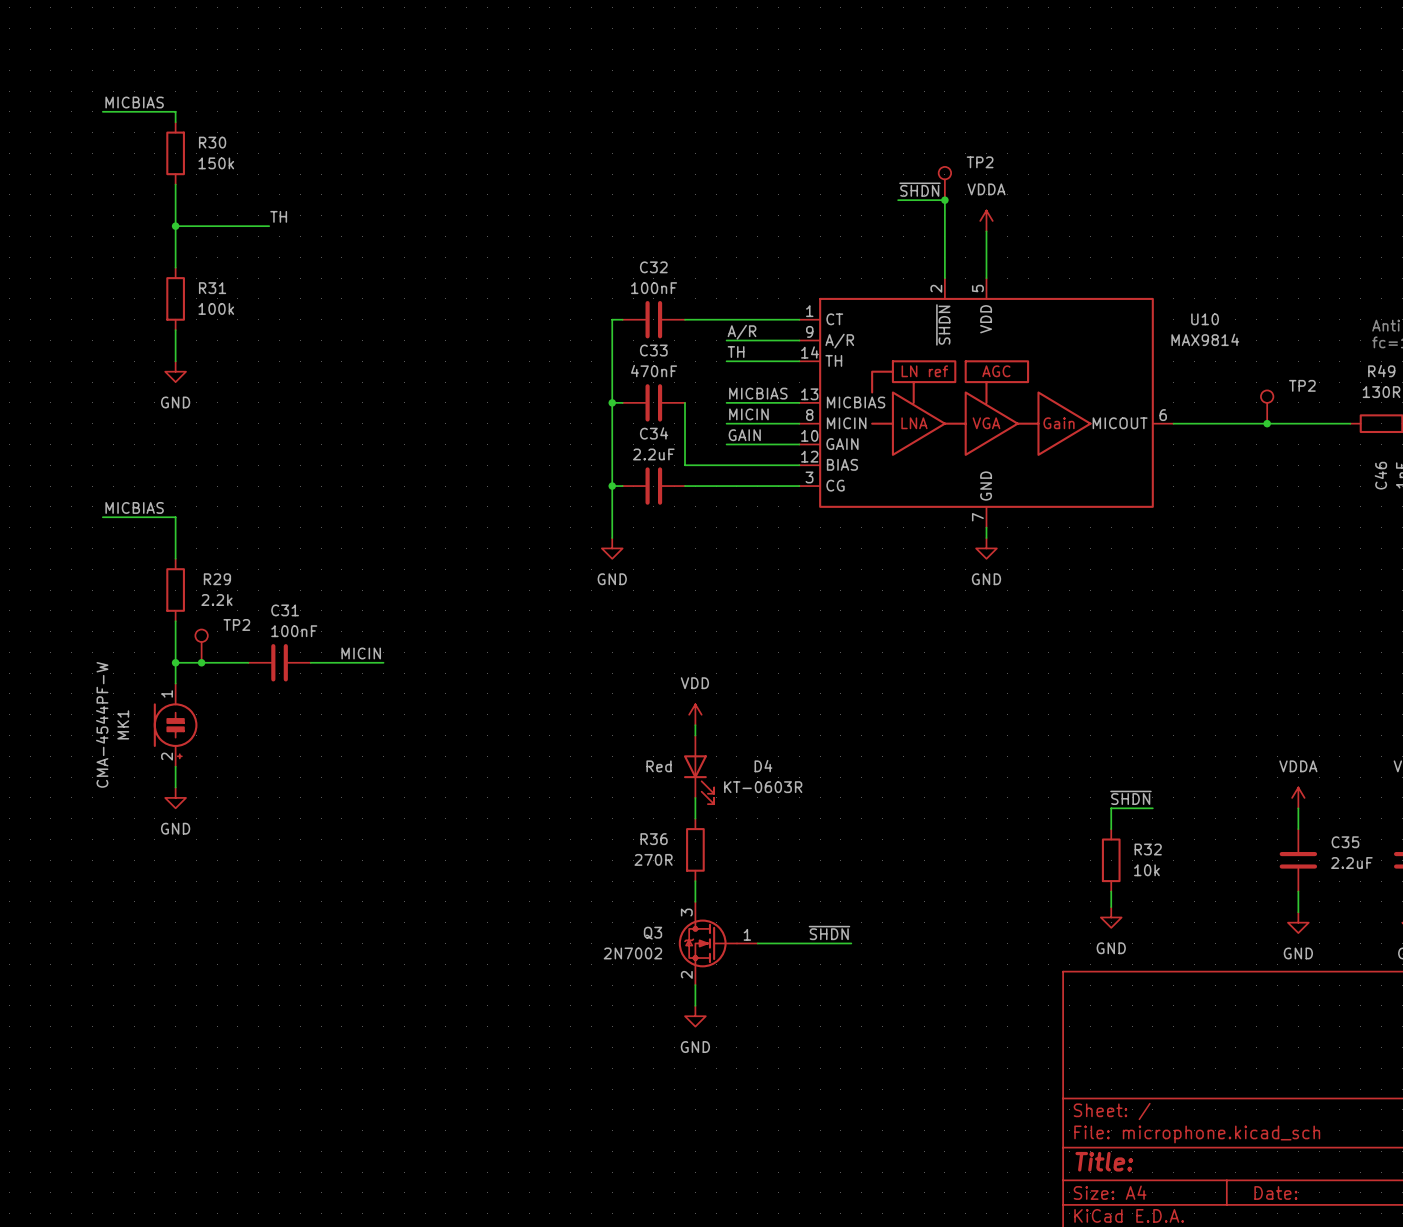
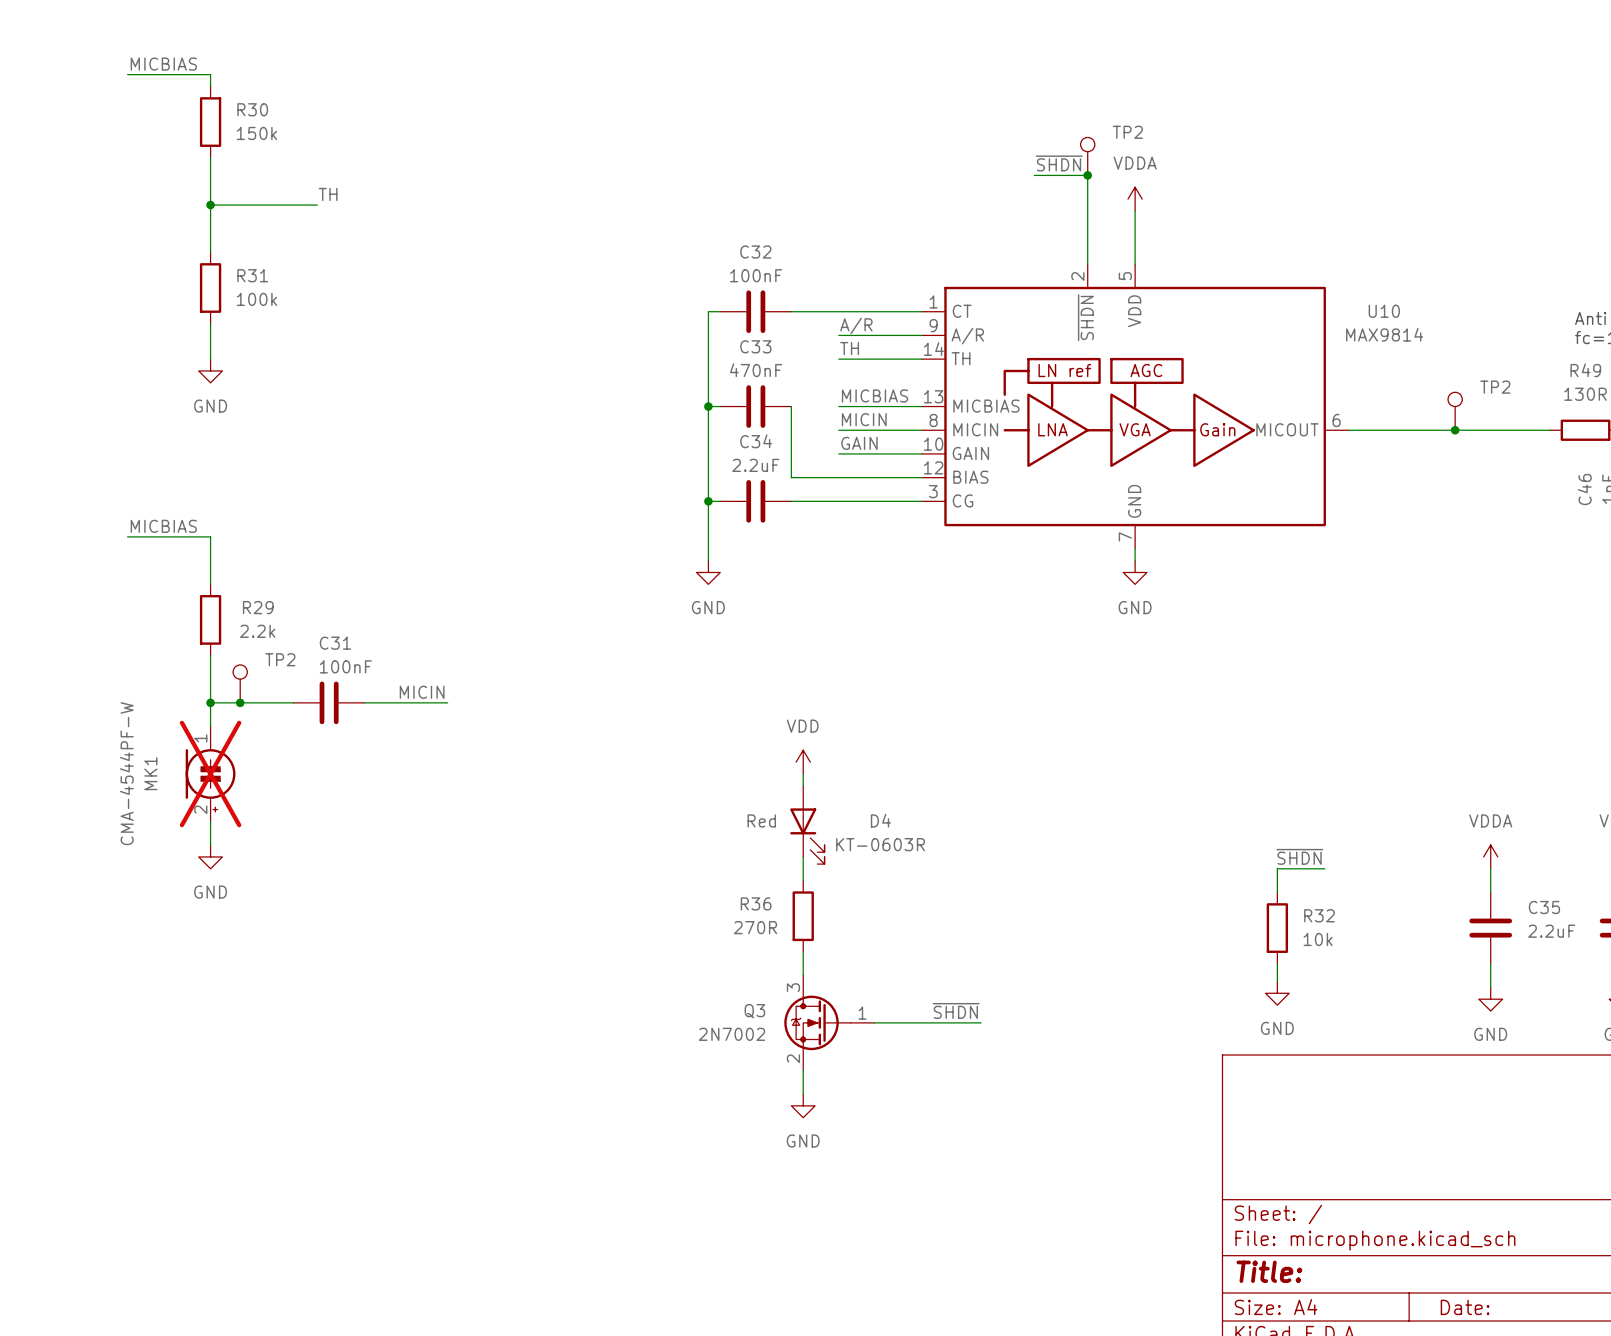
MK1 do-not-place cross: none -> (210, 773)

